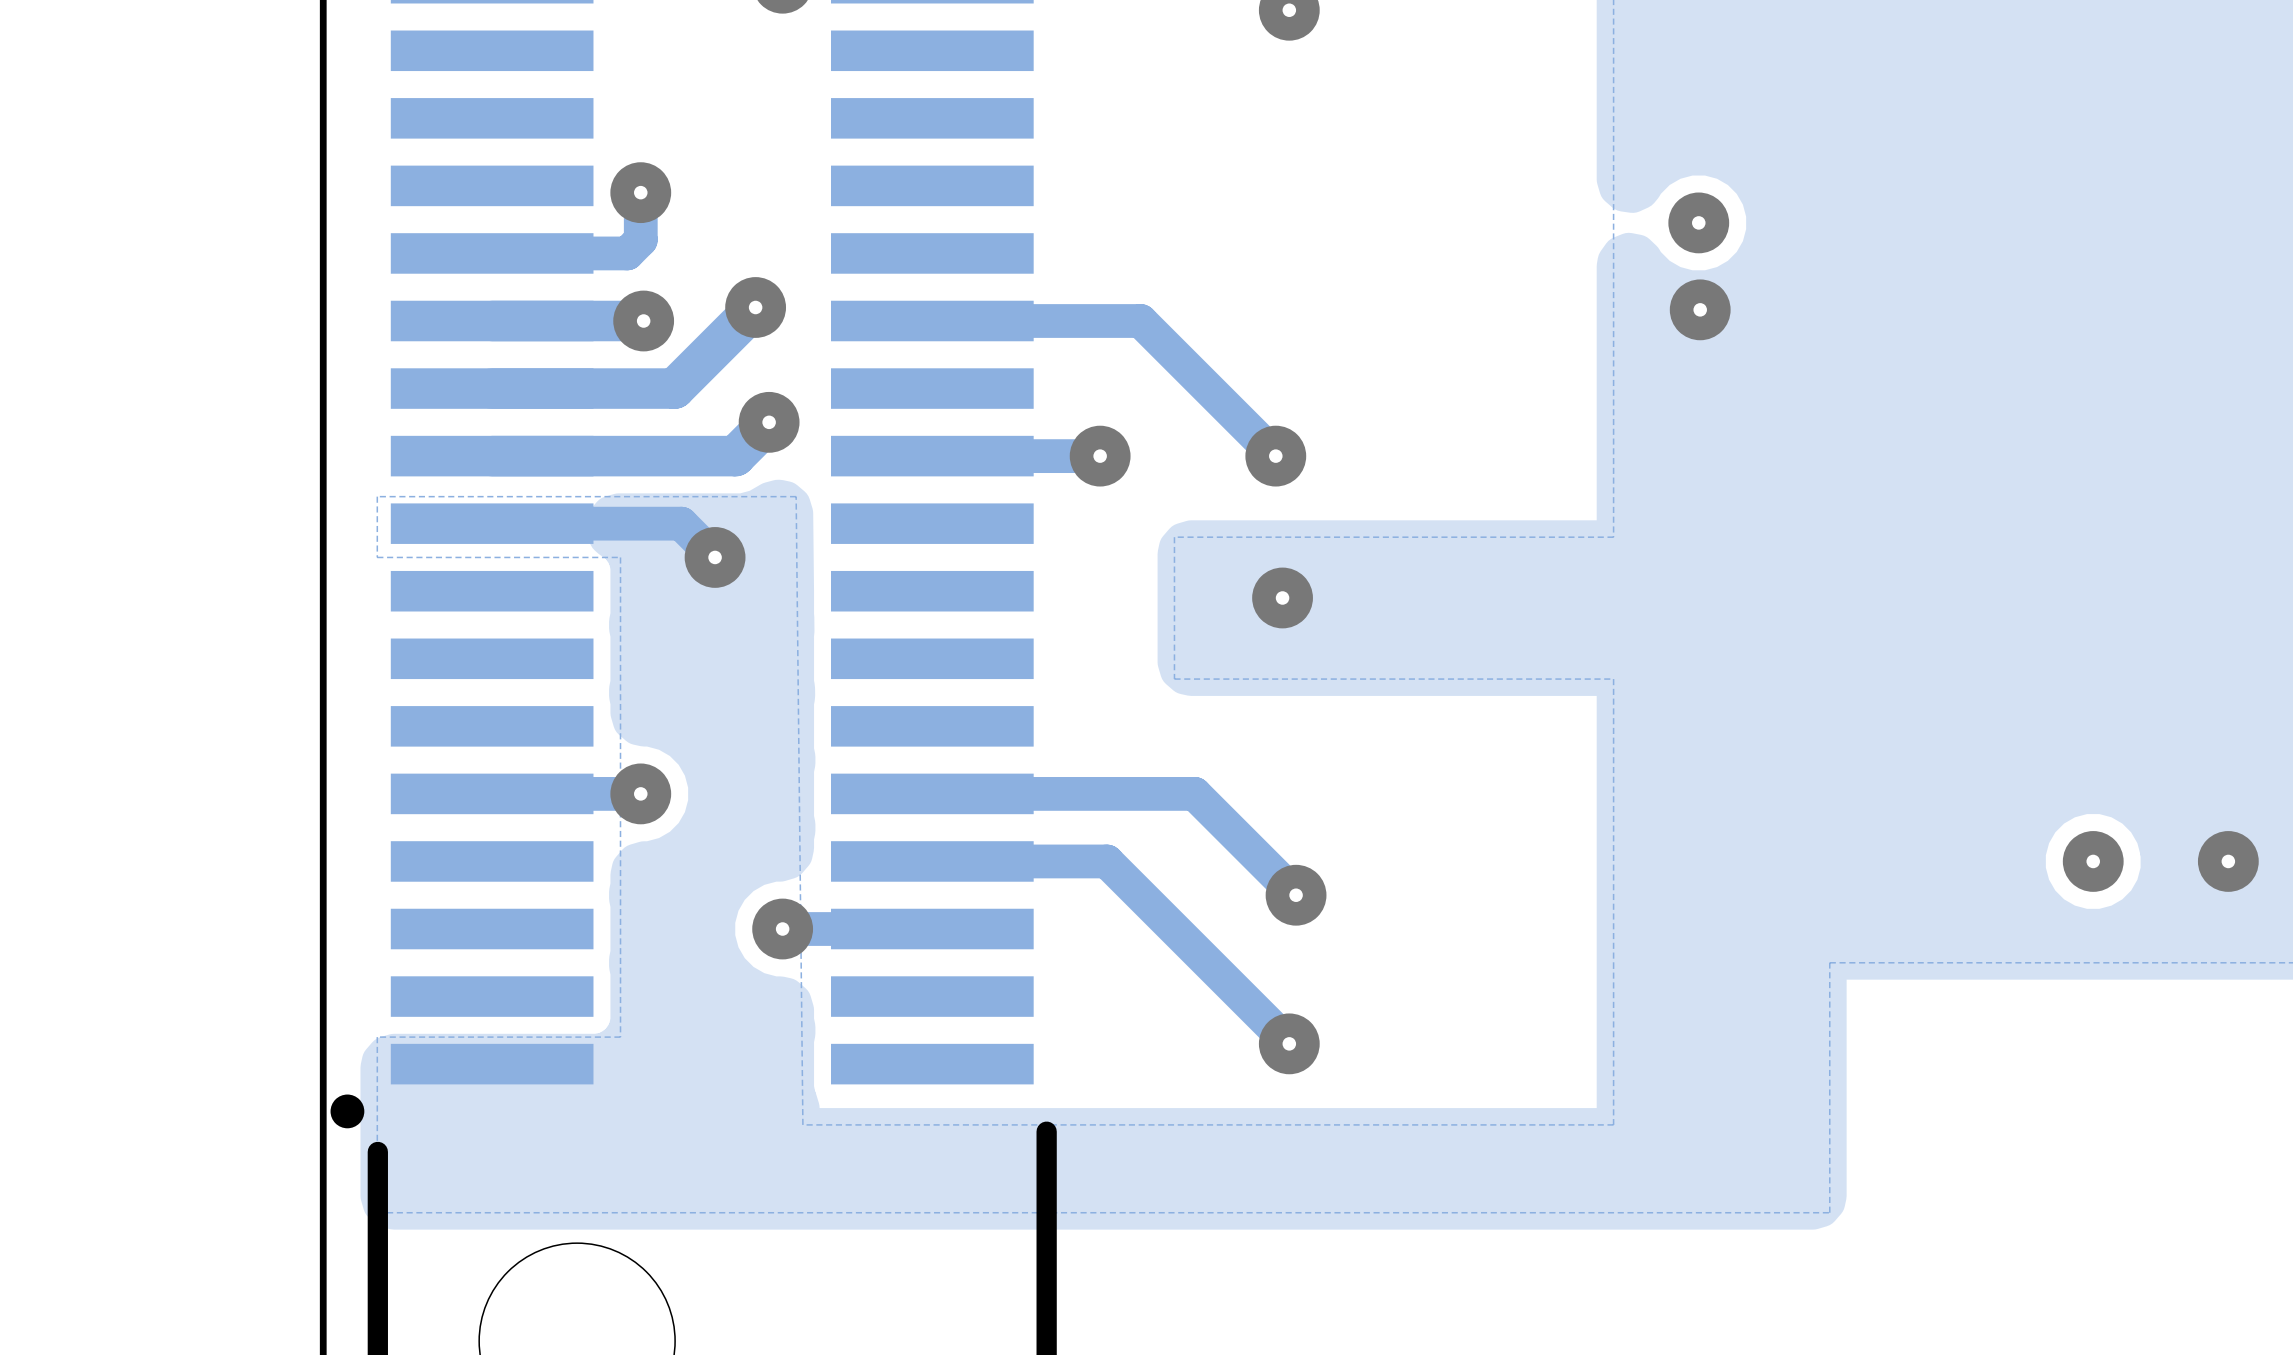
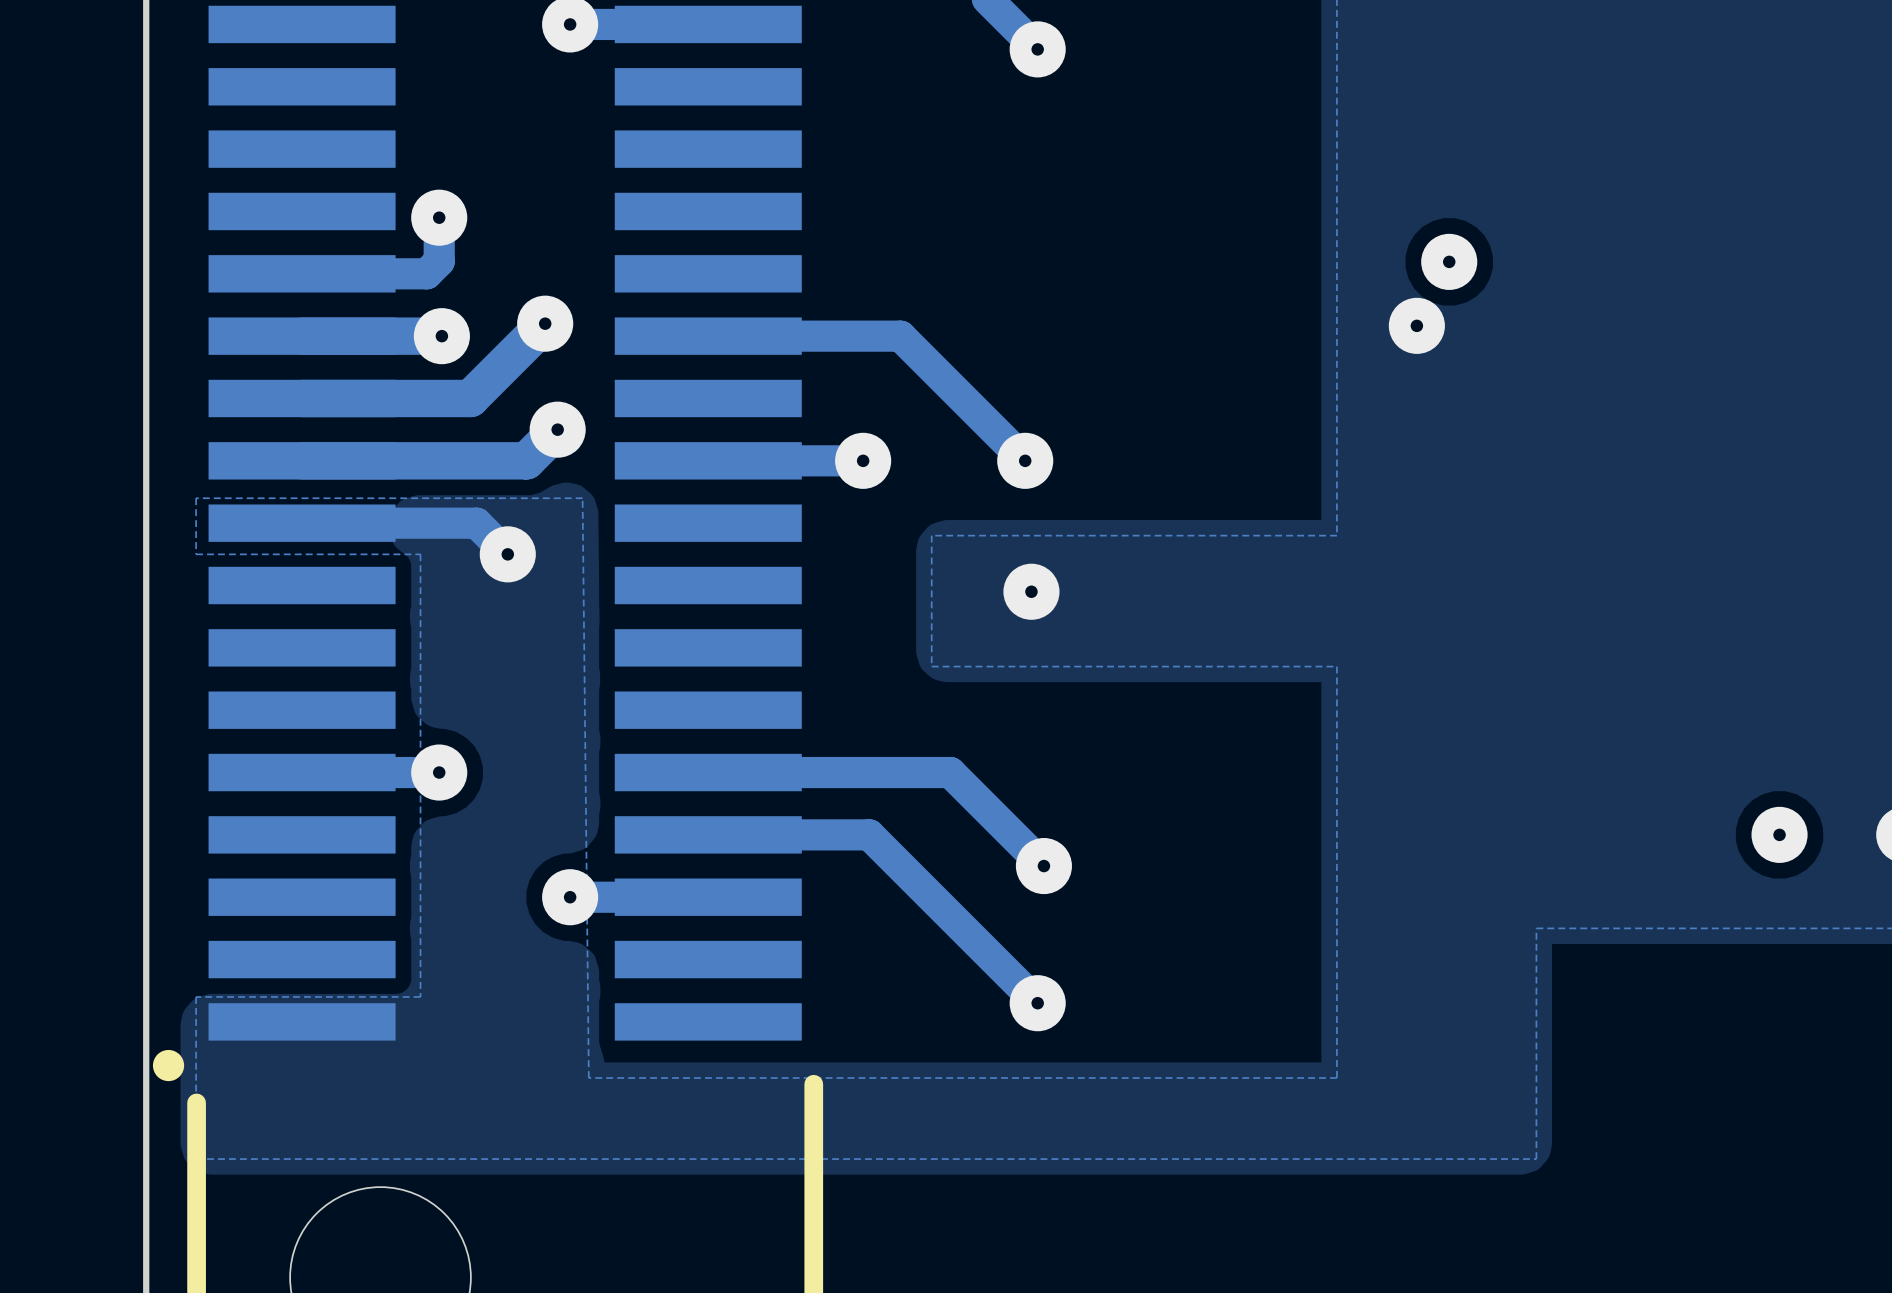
via position: (1698, 222) -> (1449, 261)

